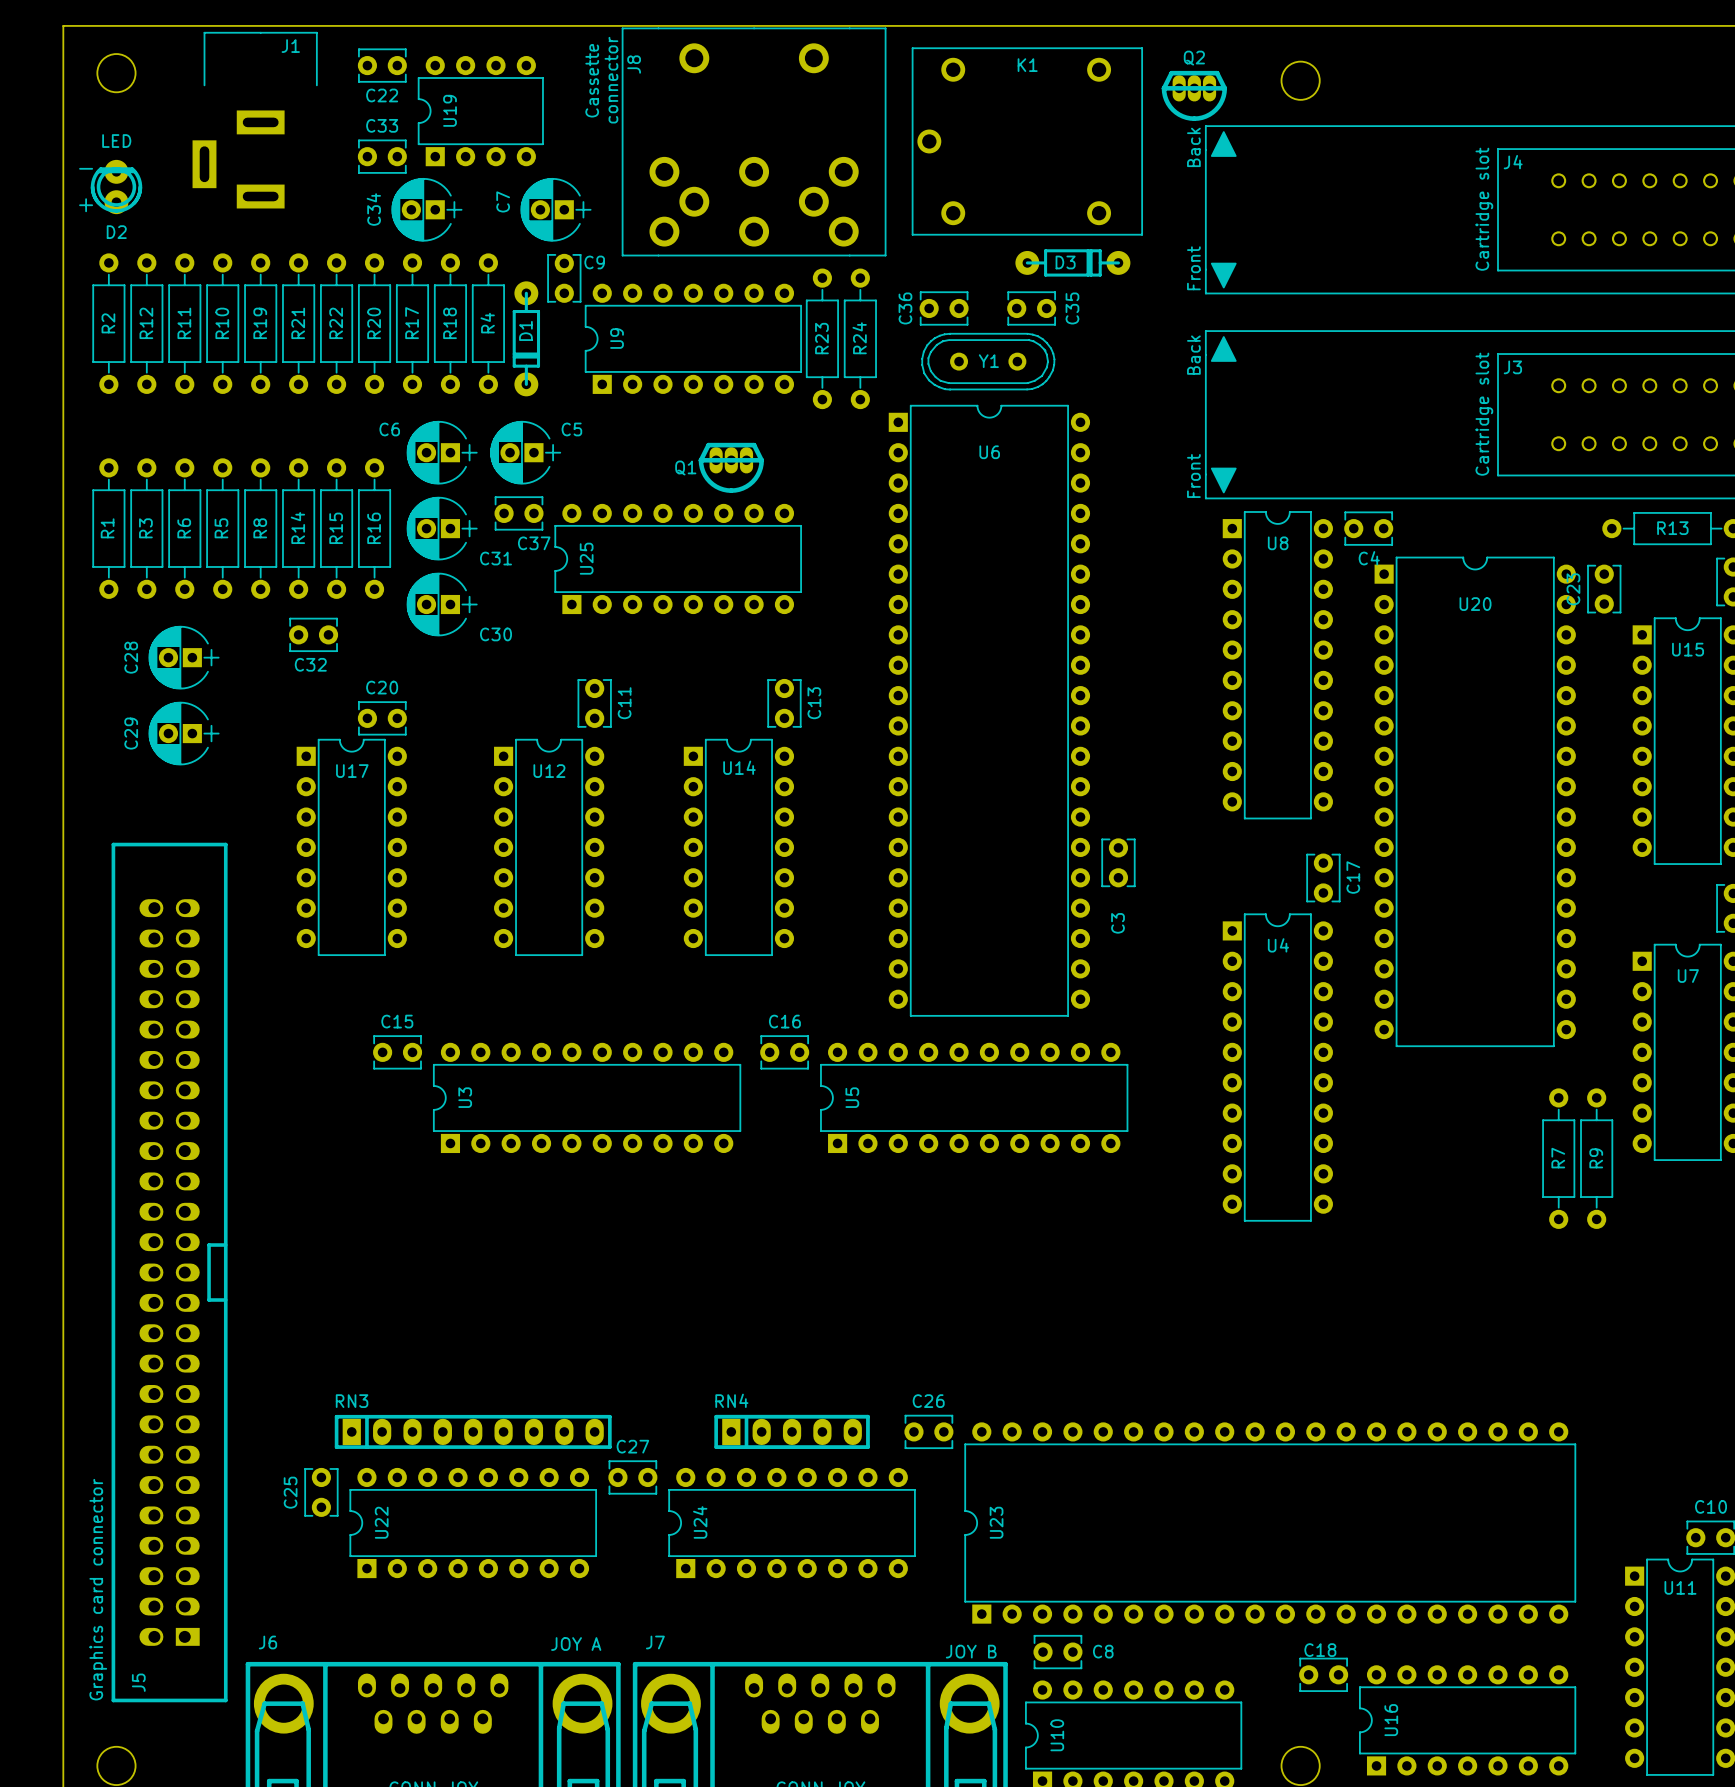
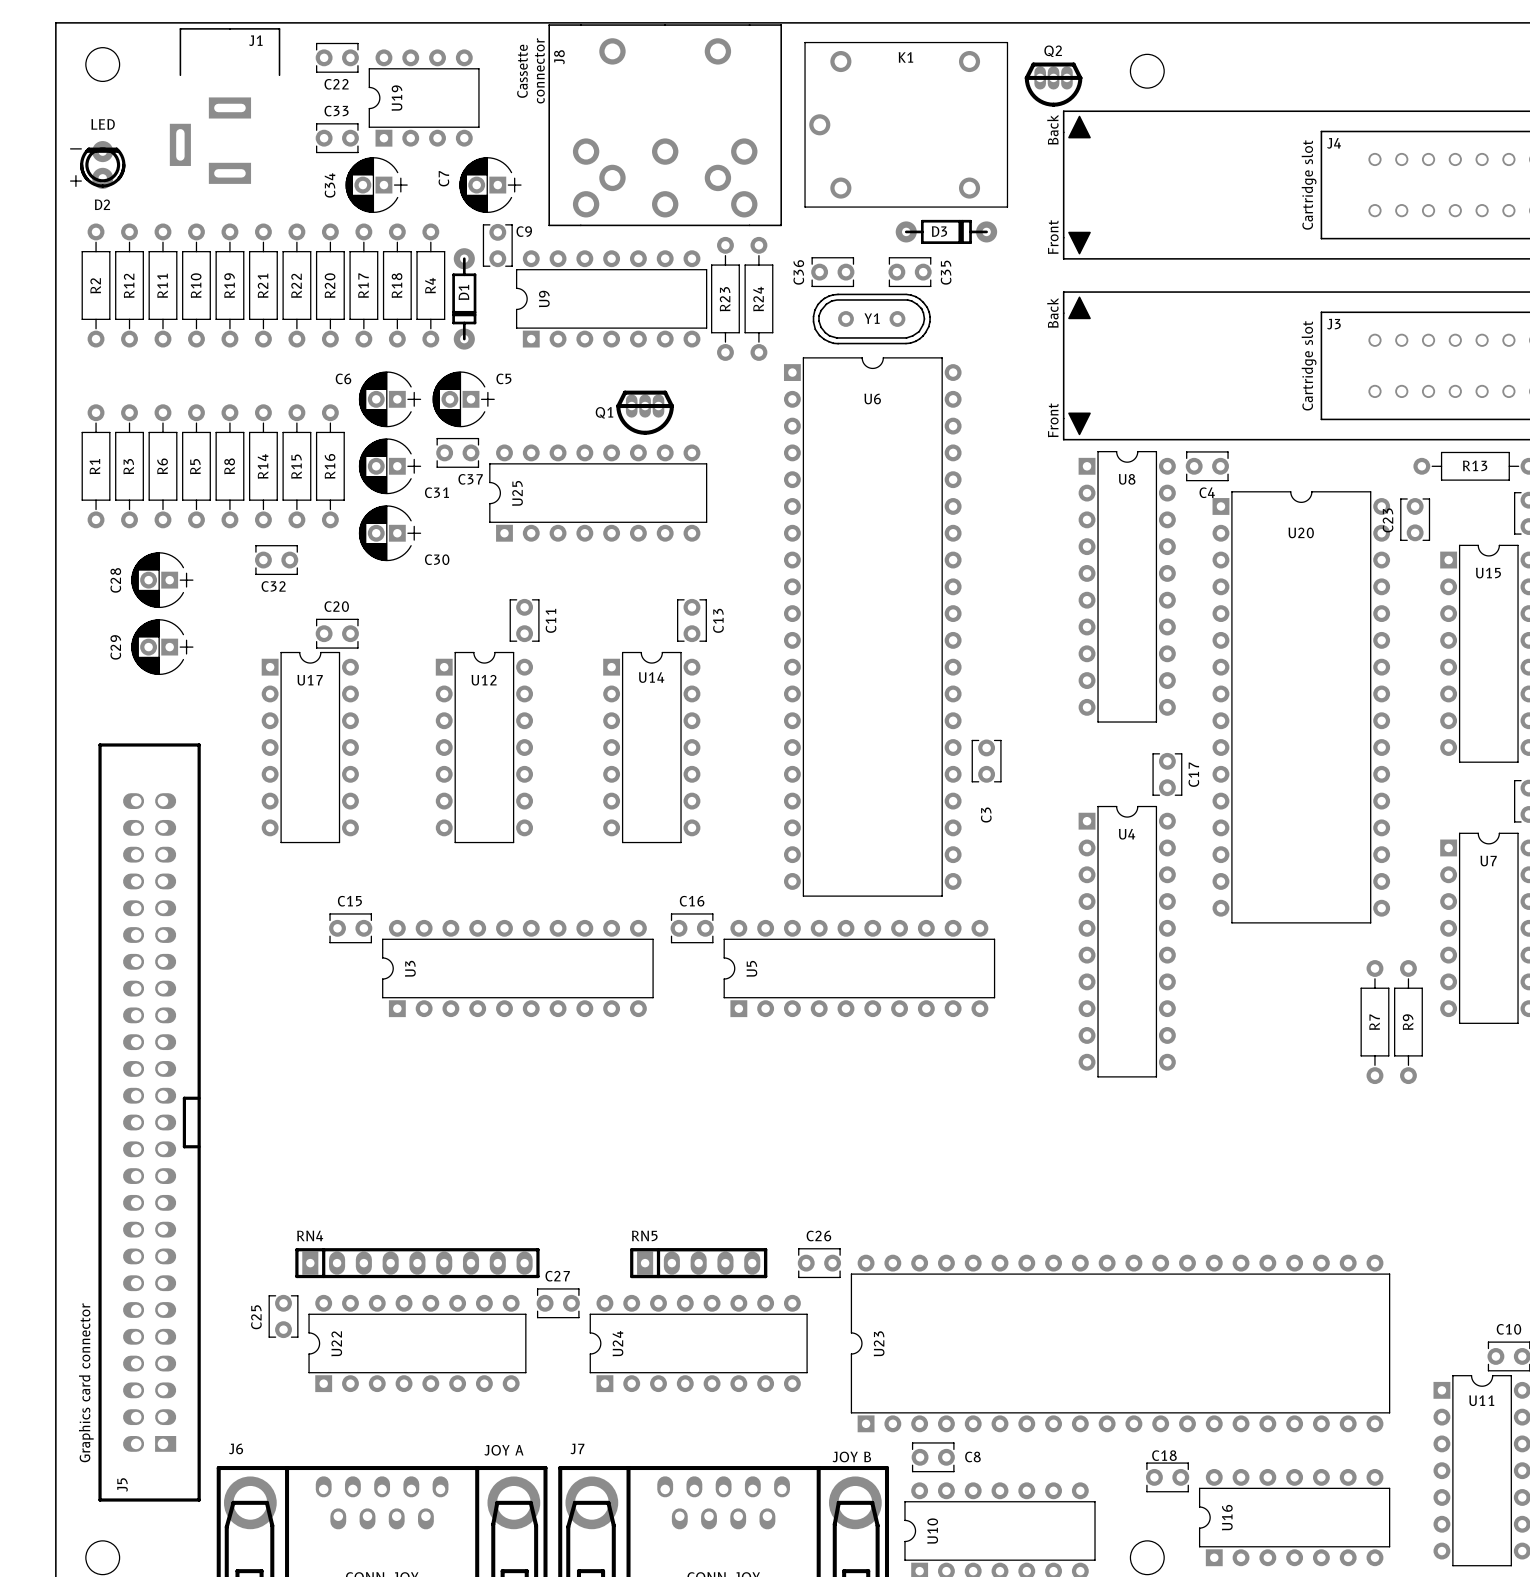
RN4 name: RN4 (731, 1400) -> RN5 (644, 1235)
RN3 name: RN3 (352, 1401) -> RN4 (310, 1235)

